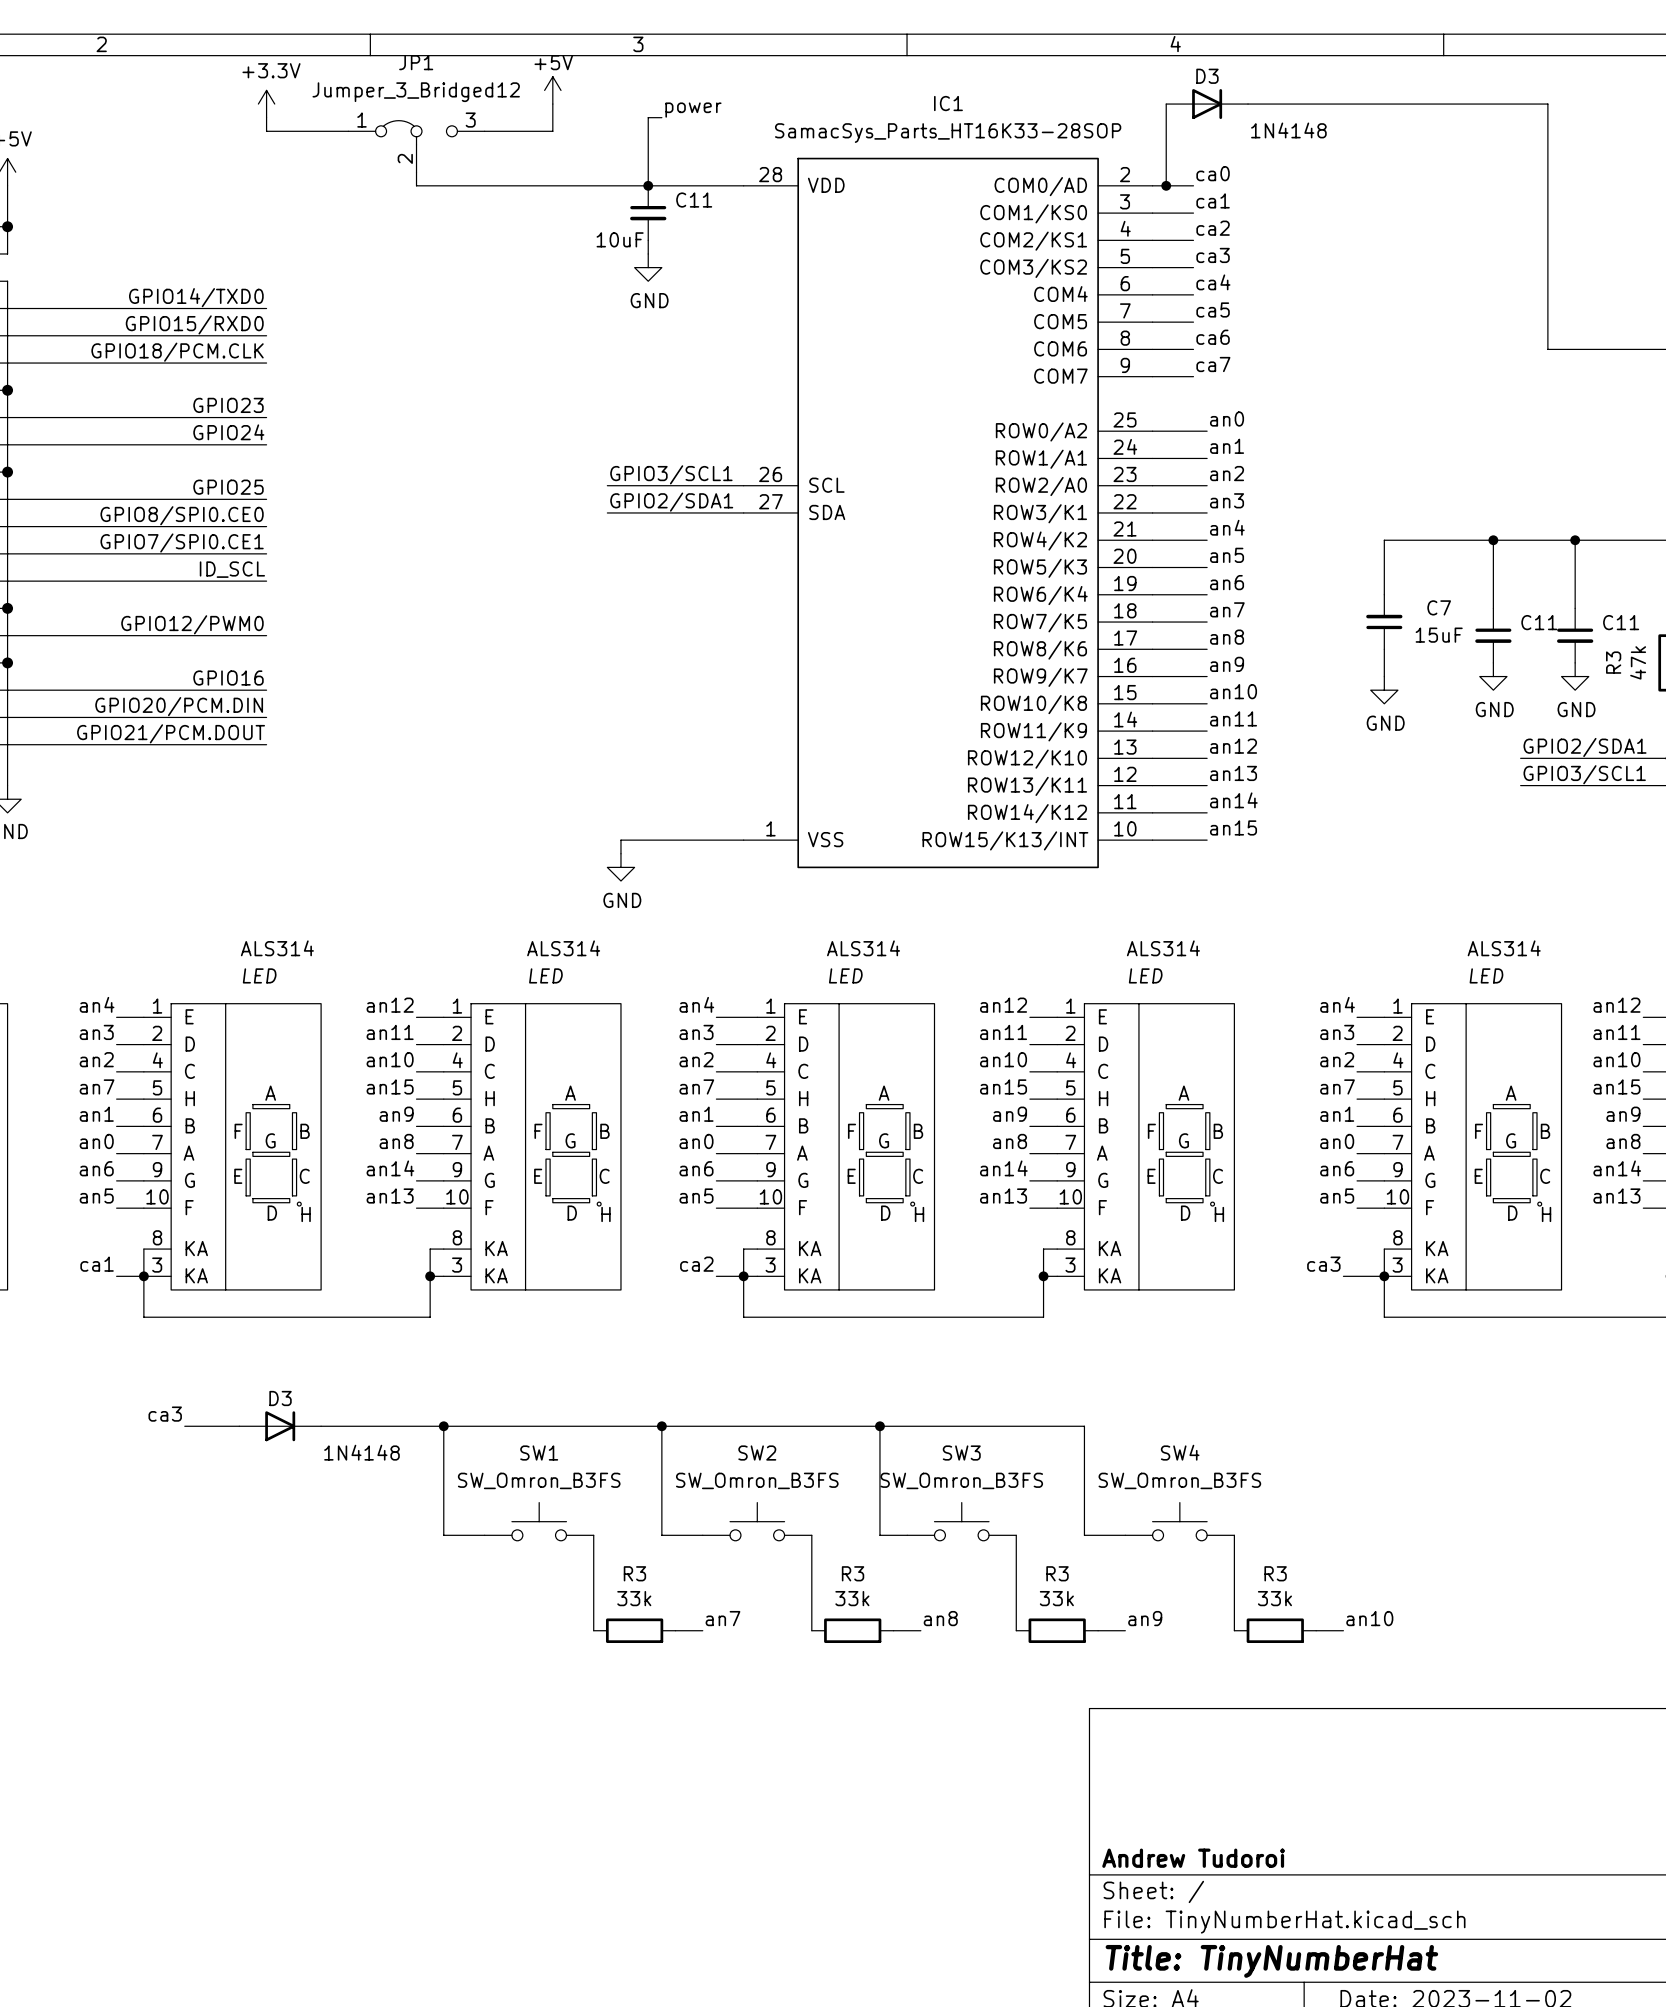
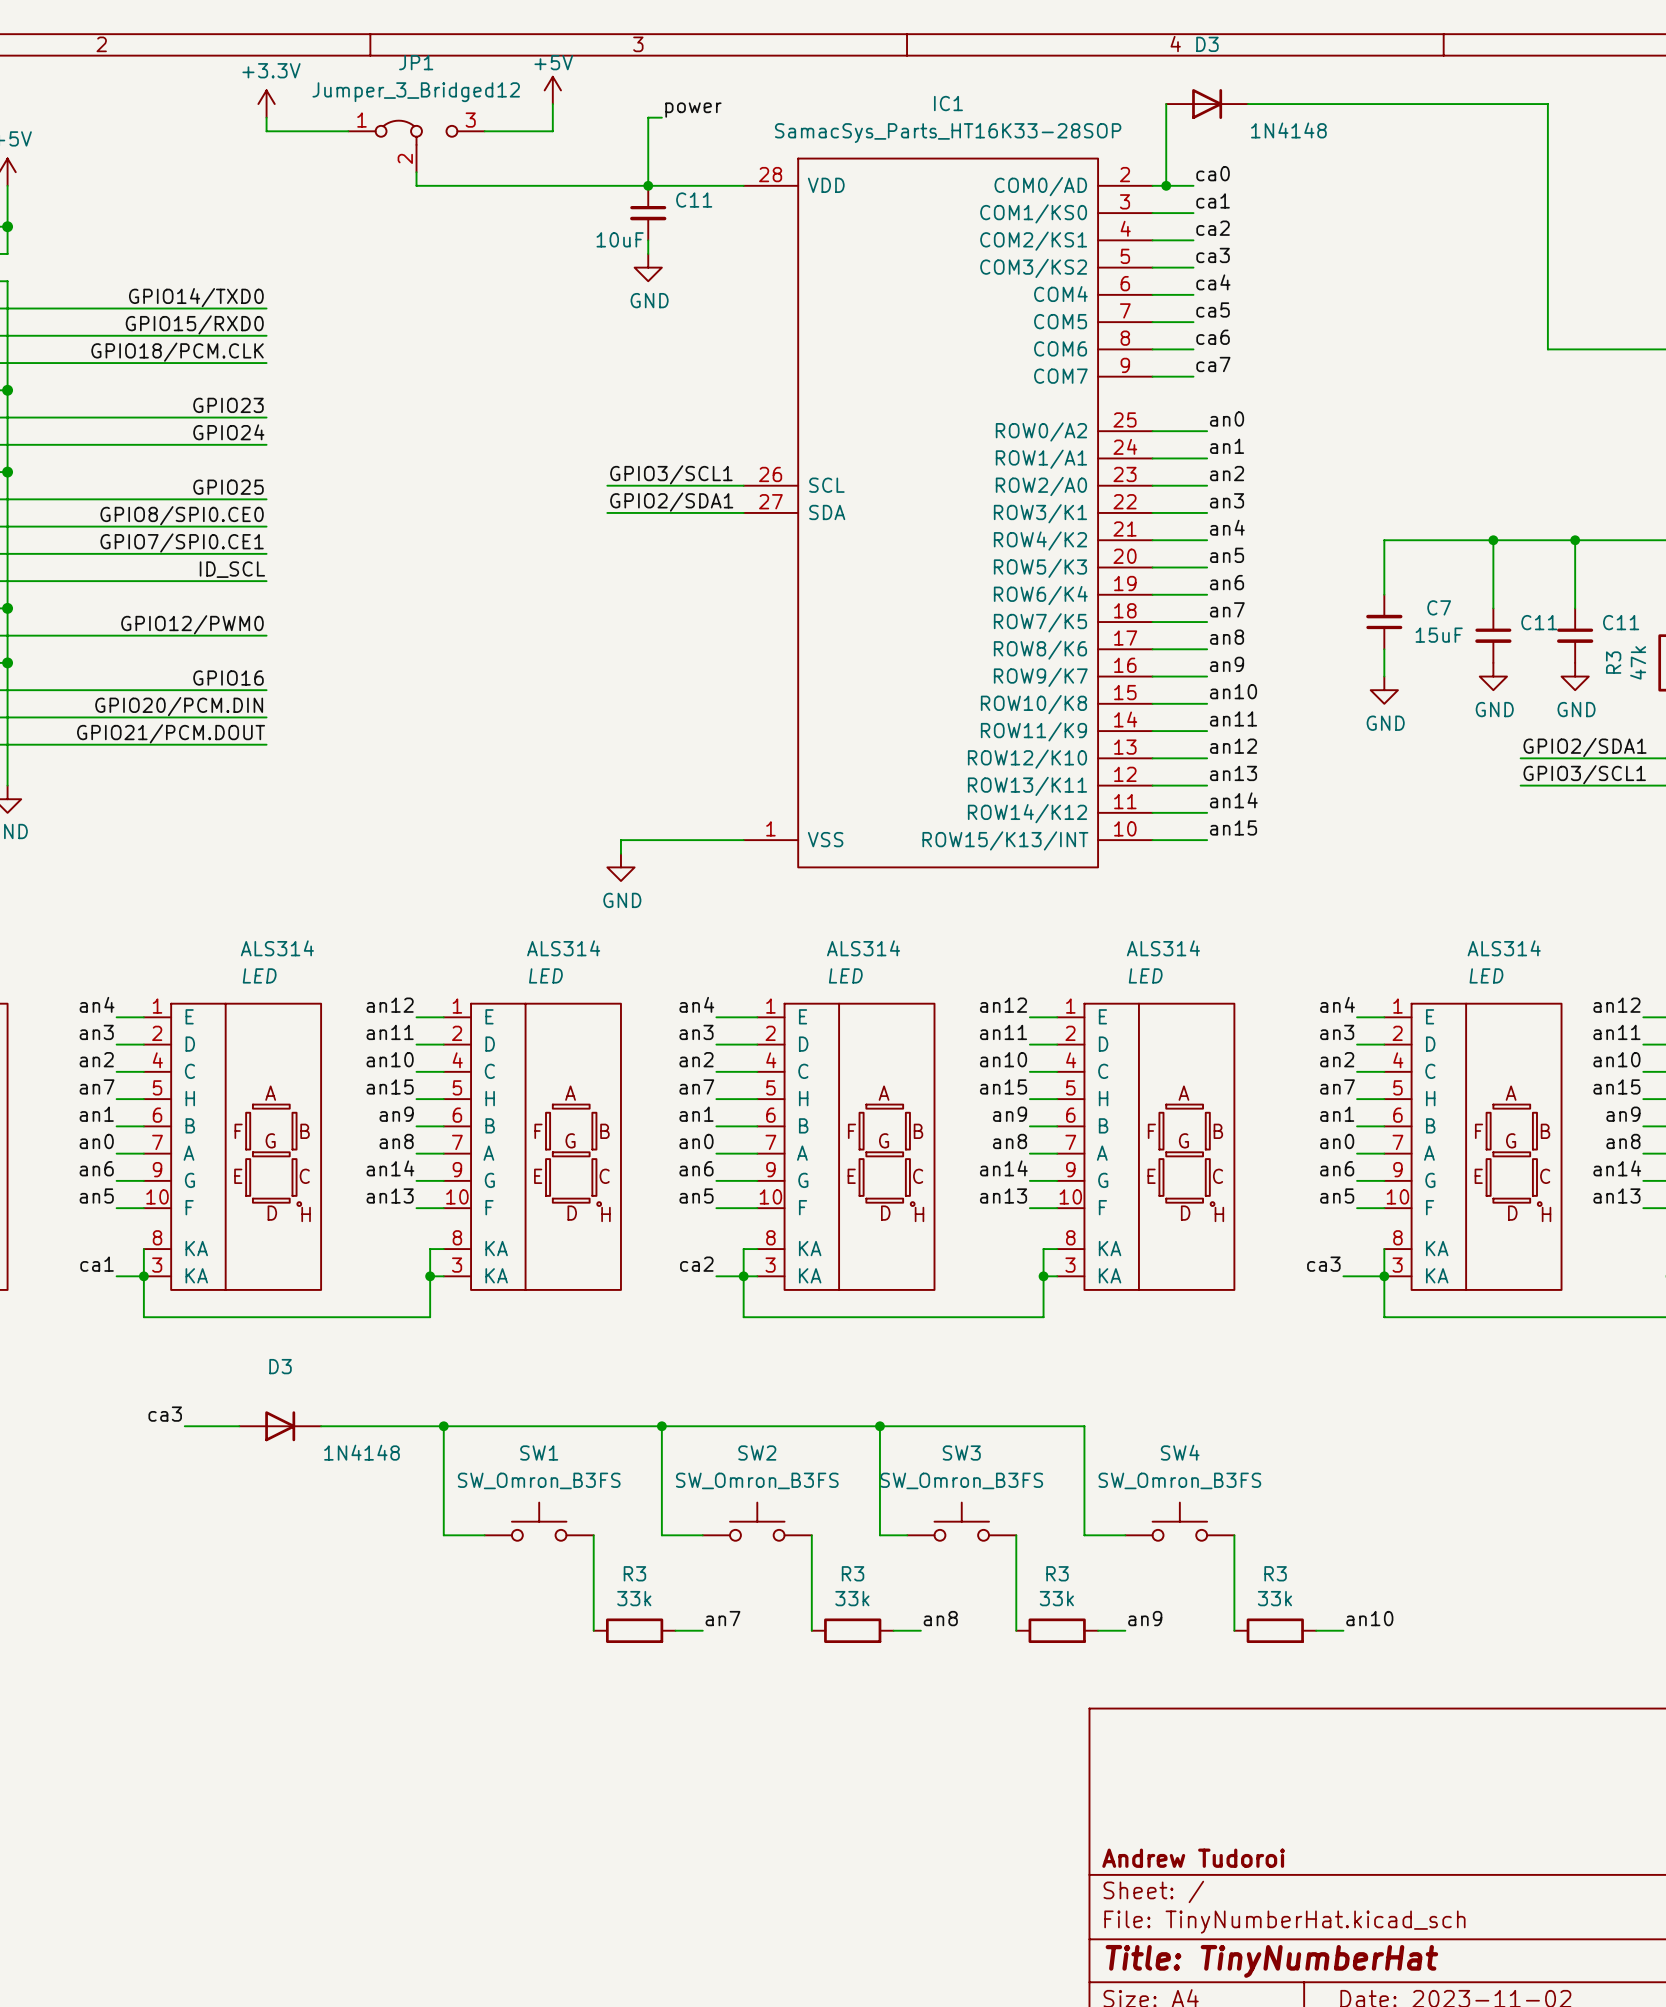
D3 name position: D3 (1207, 76) -> D3 (1207, 44)
D3 name position: D3 (280, 1398) -> D3 (280, 1366)

